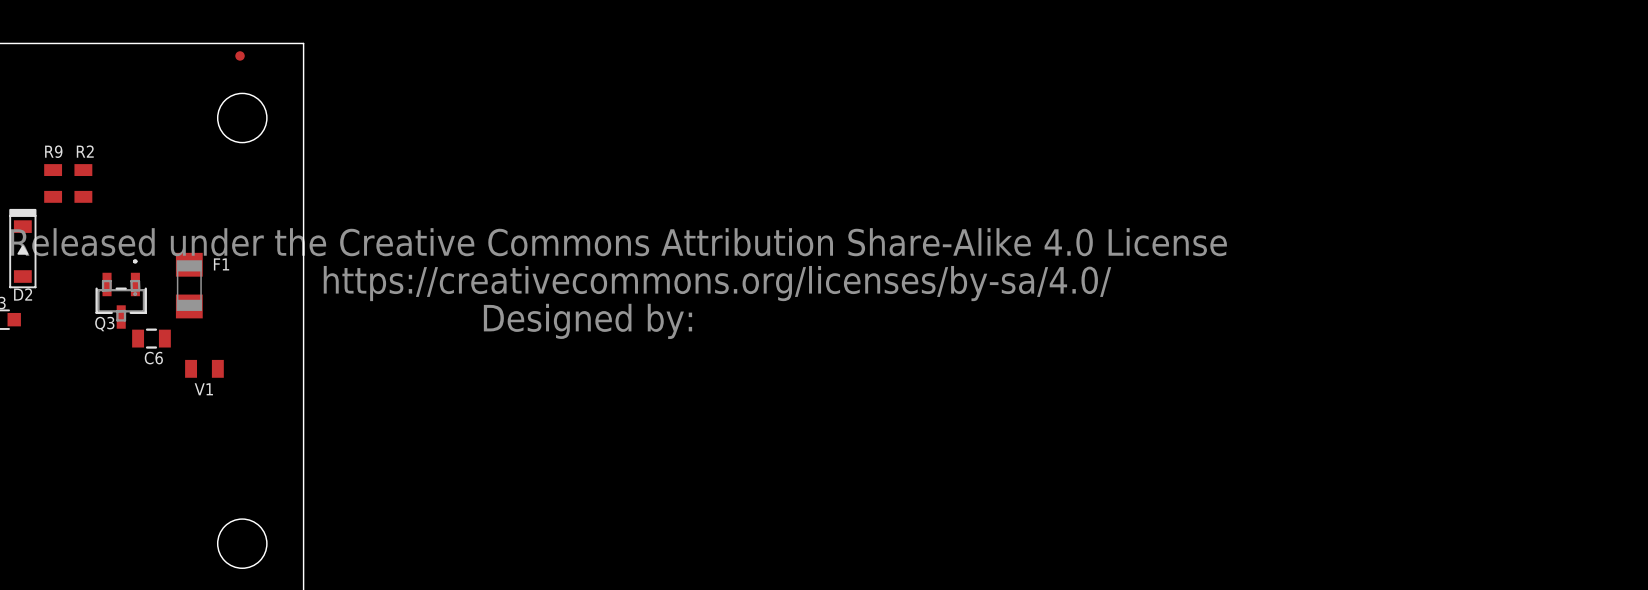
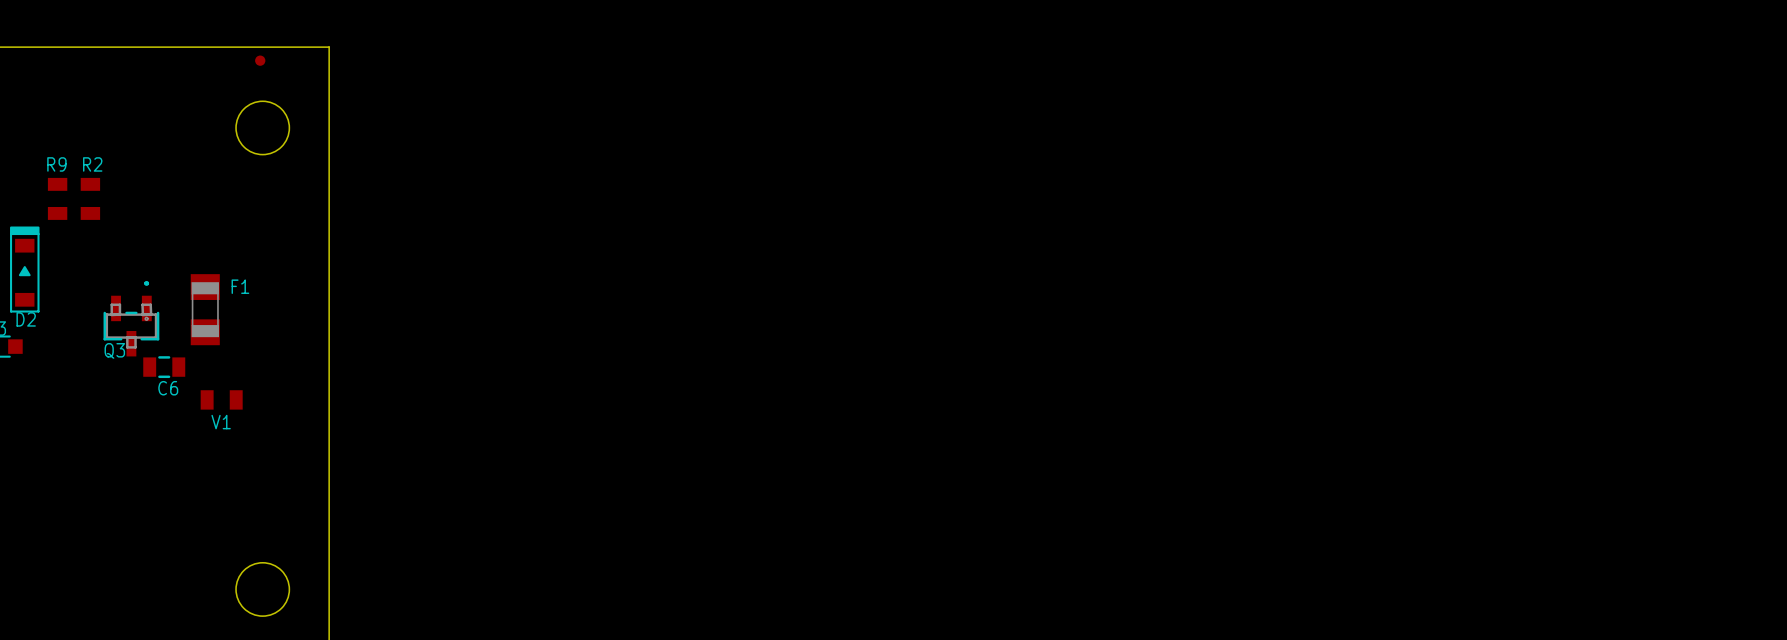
drawing: [10, 228, 1227, 339] -> none

